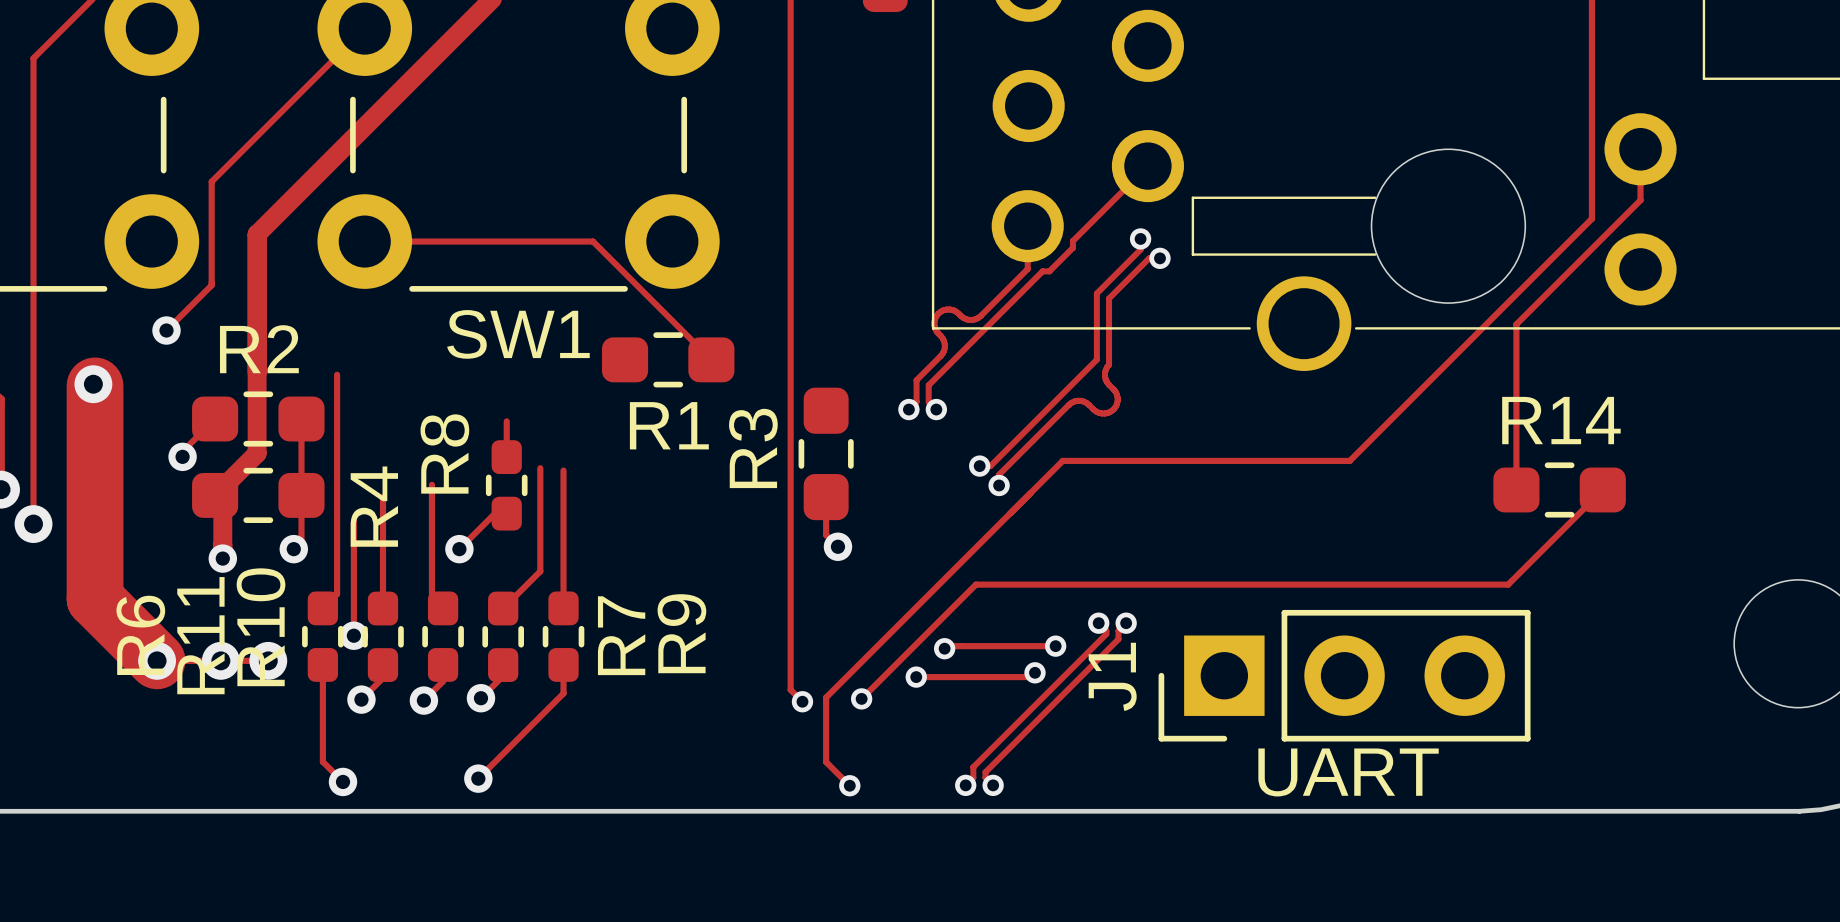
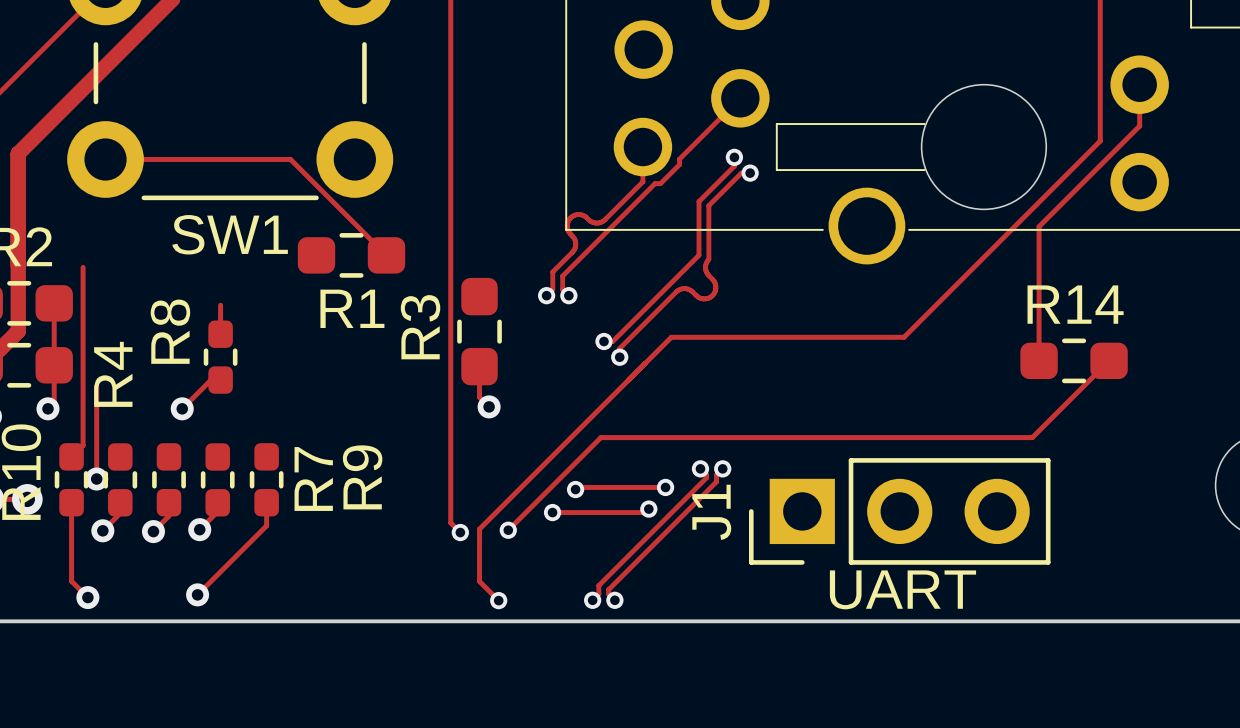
track: (540, 468) (540, 571) (503, 608) -> none
track: (563, 470) (563, 608) -> none
track: (431, 484) (431, 597) (443, 608) -> none
track: (382, 497) (382, 608) -> none

